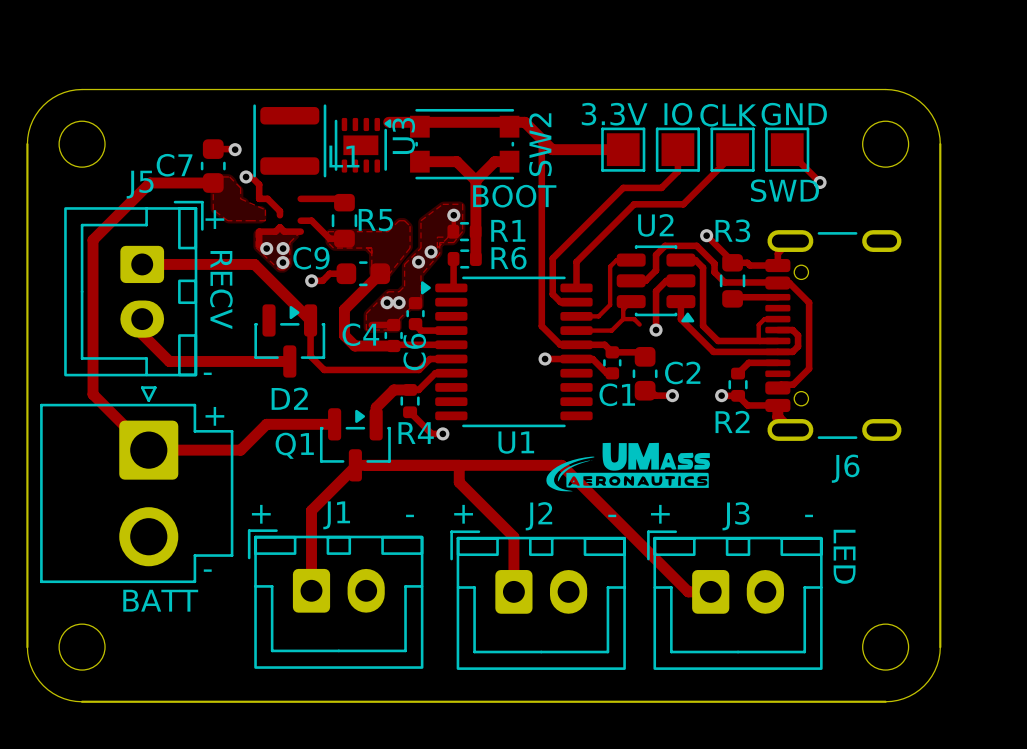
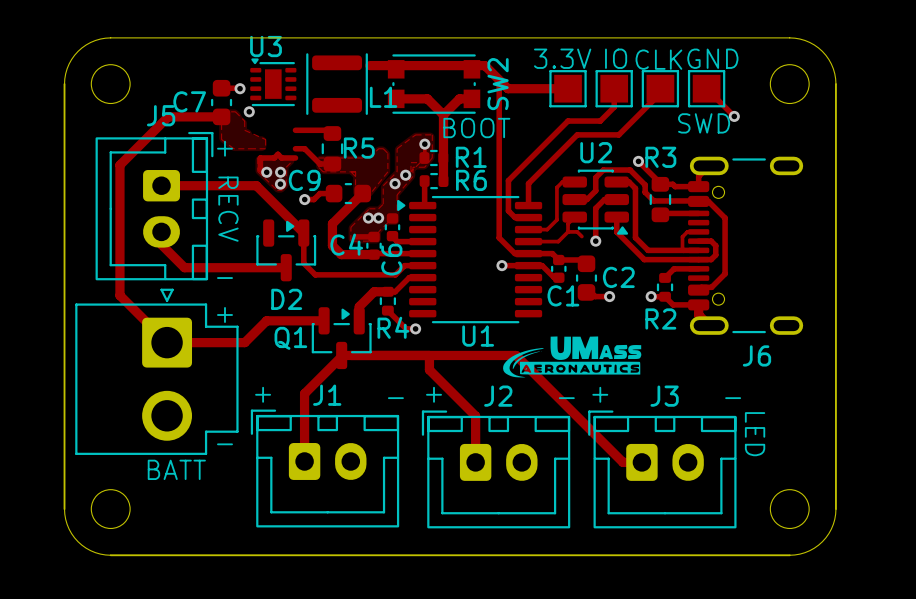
L1 position: (289, 140) -> (337, 84)
U3 rotation: 0° (362, 145) -> 90° counterclockwise (273, 82)
U3 position: (362, 145) -> (273, 82)
track: (251, 176) (259, 184) (259, 198) (267, 198) (279, 211) (279, 215) -> none

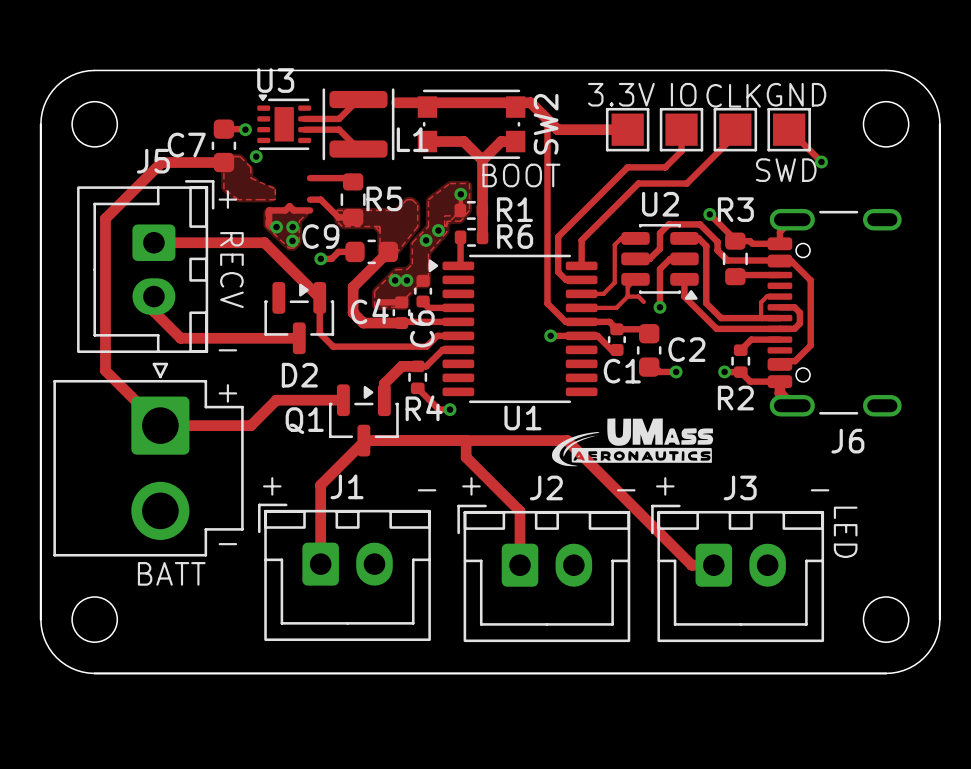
track: none -> (358, 99) (339, 118) (304, 118)
track: none -> (304, 129) (339, 129) (358, 149)

